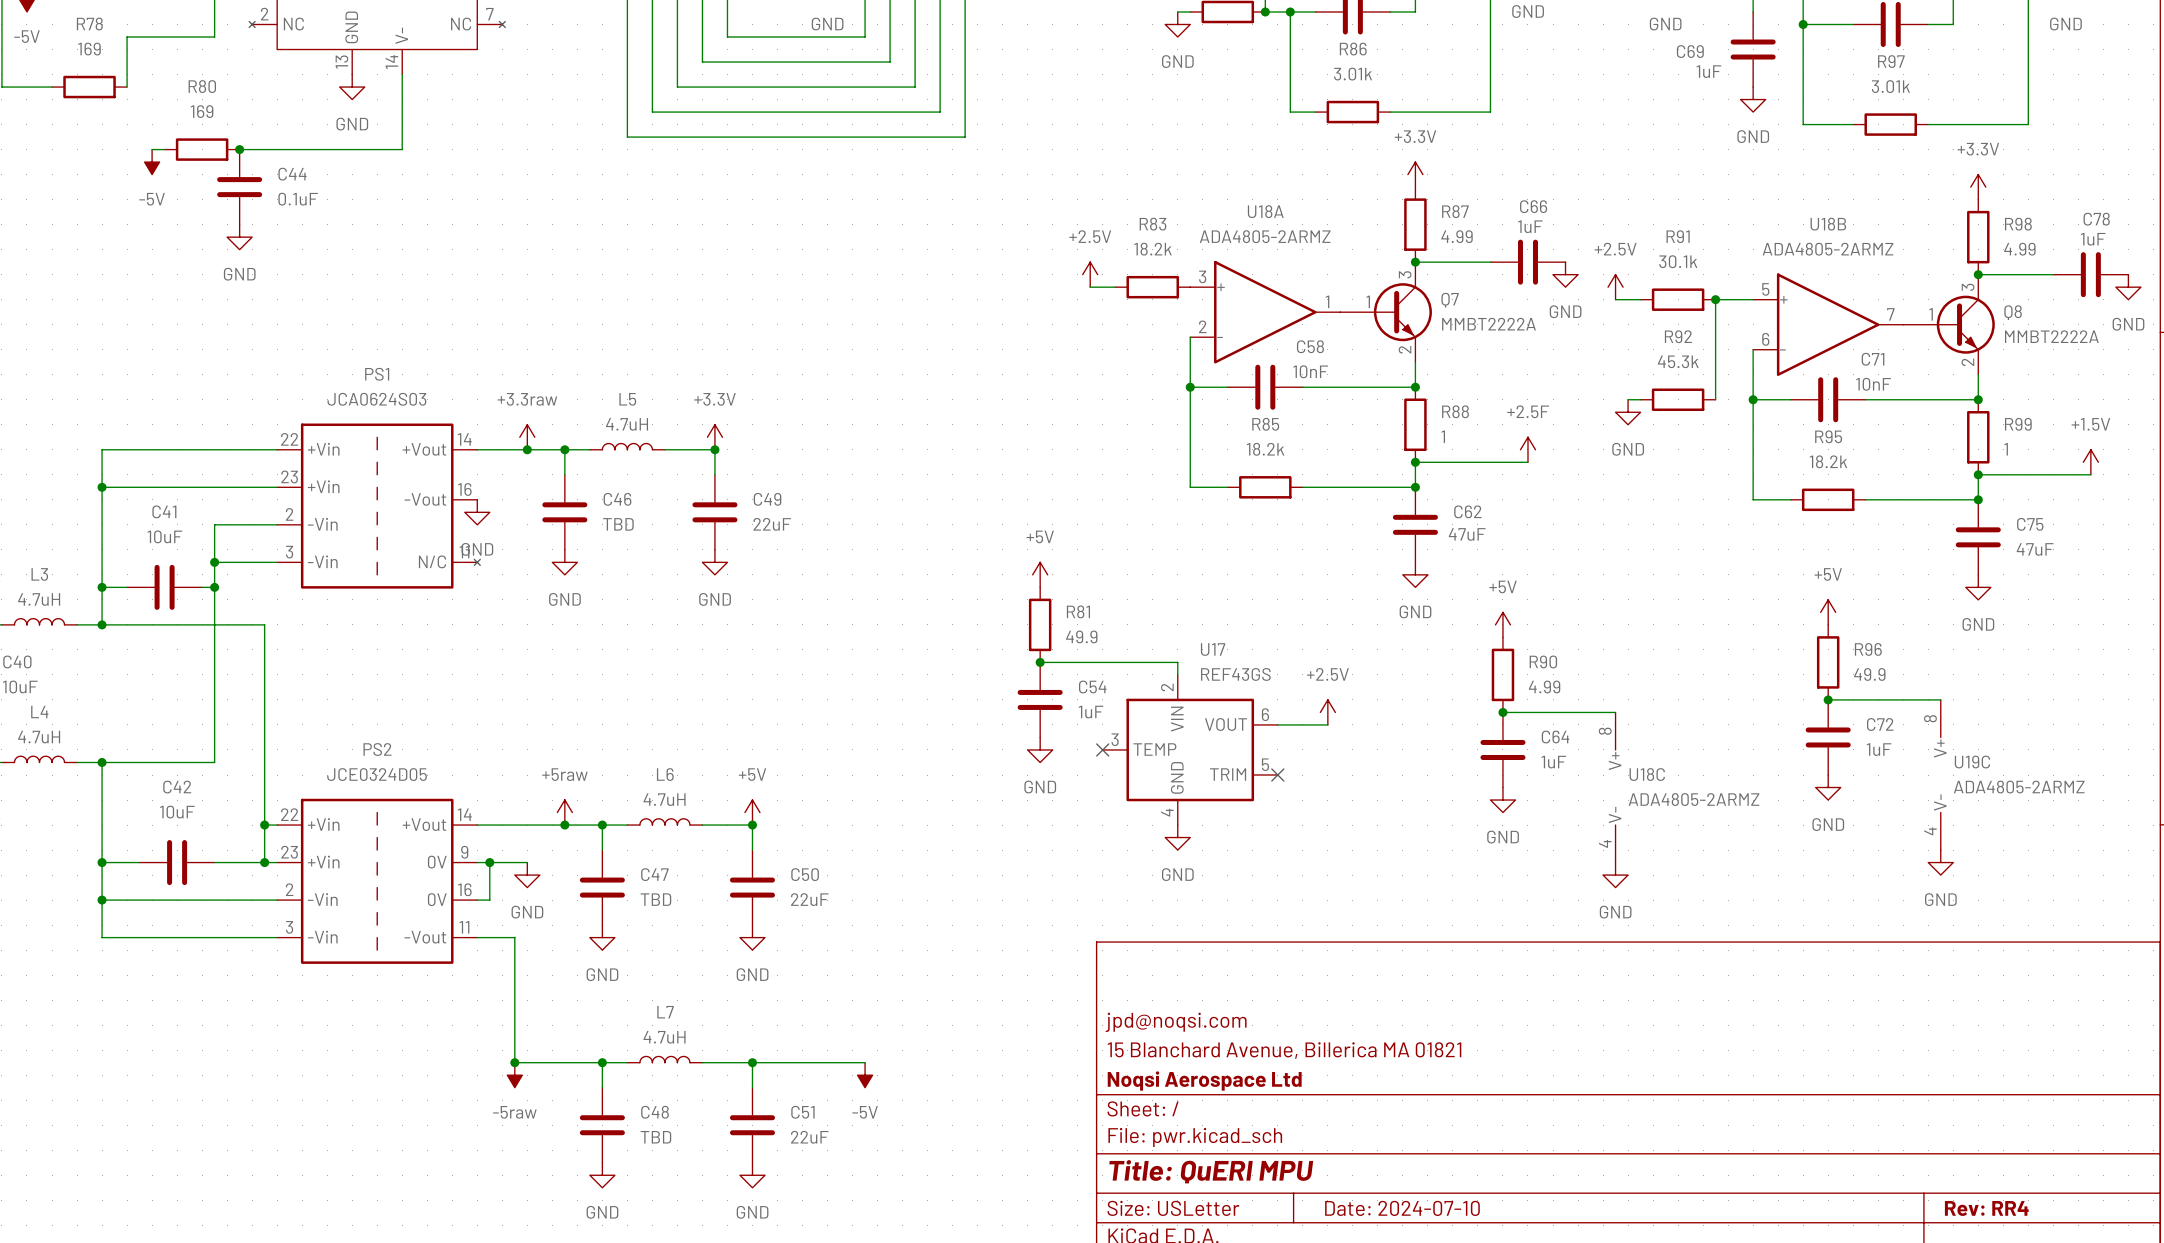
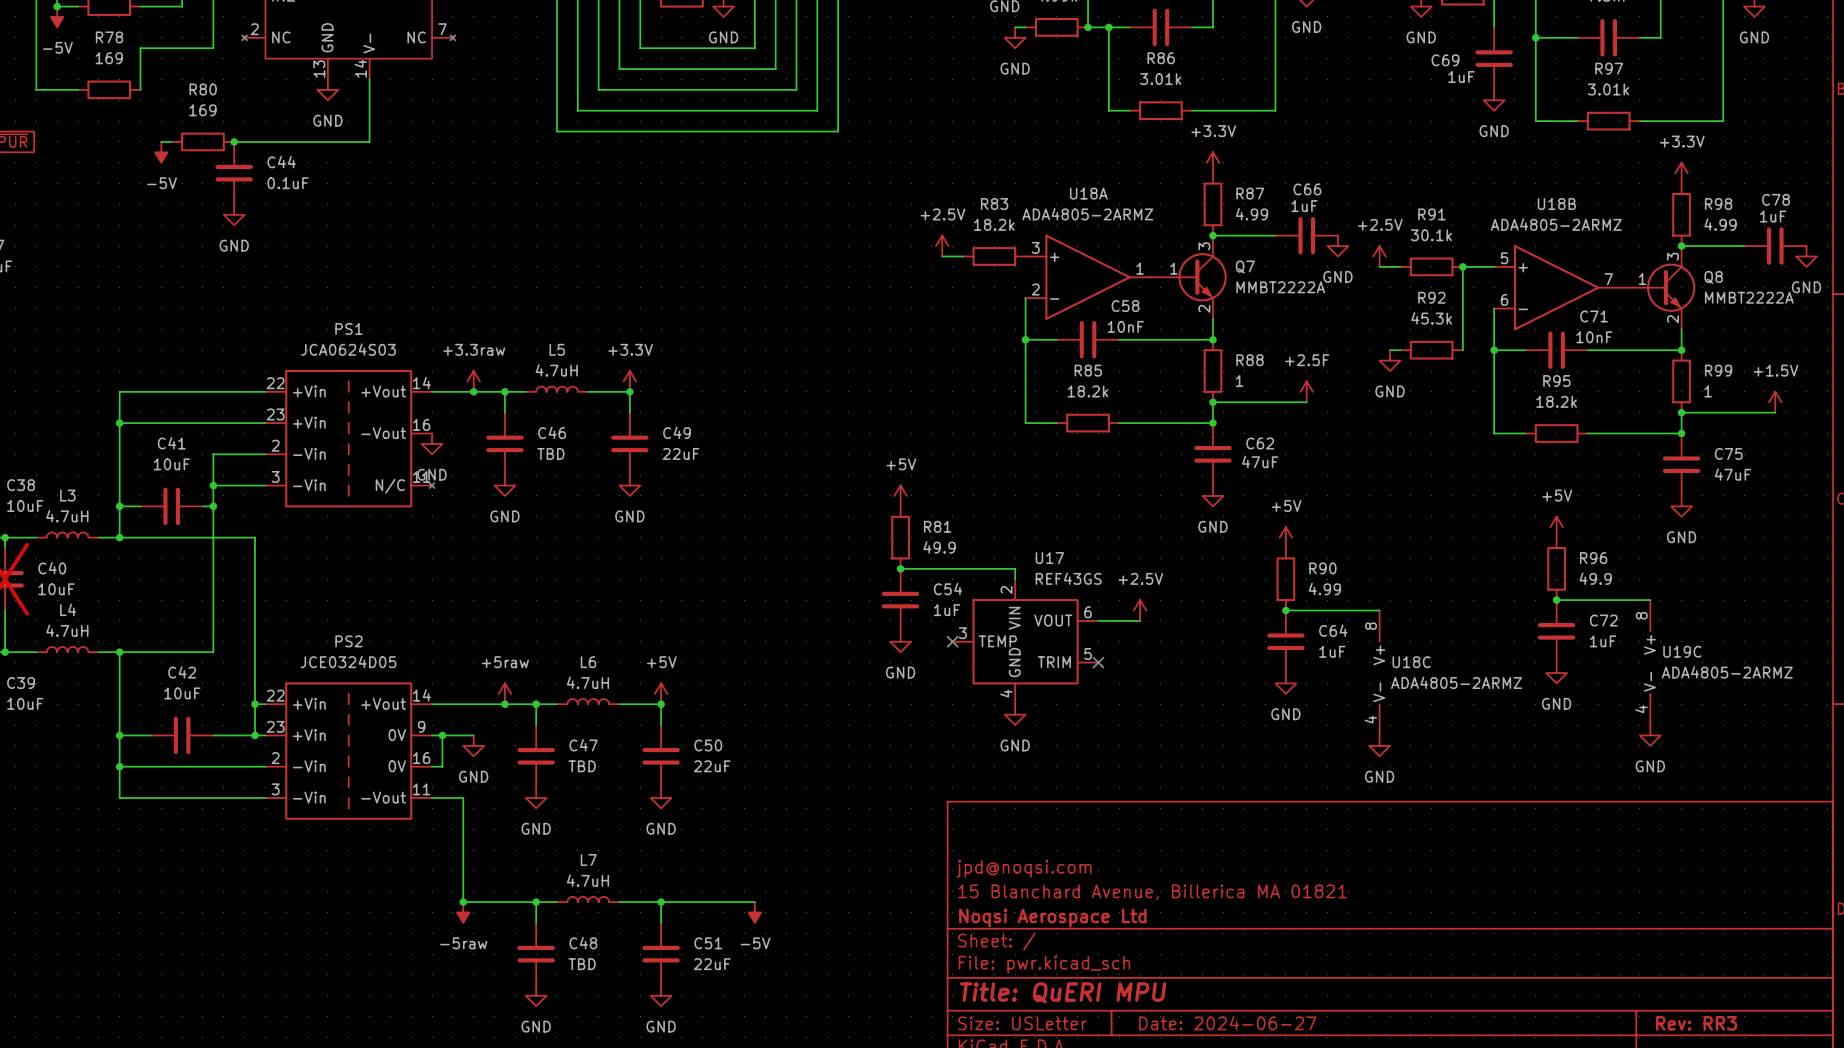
title block: Date: 2024-07-10 (1402, 1208) -> Date: 2024-06-27 (1227, 1023)
title block: Rev: RR4 (1986, 1208) -> Rev: RR3 (1696, 1023)

